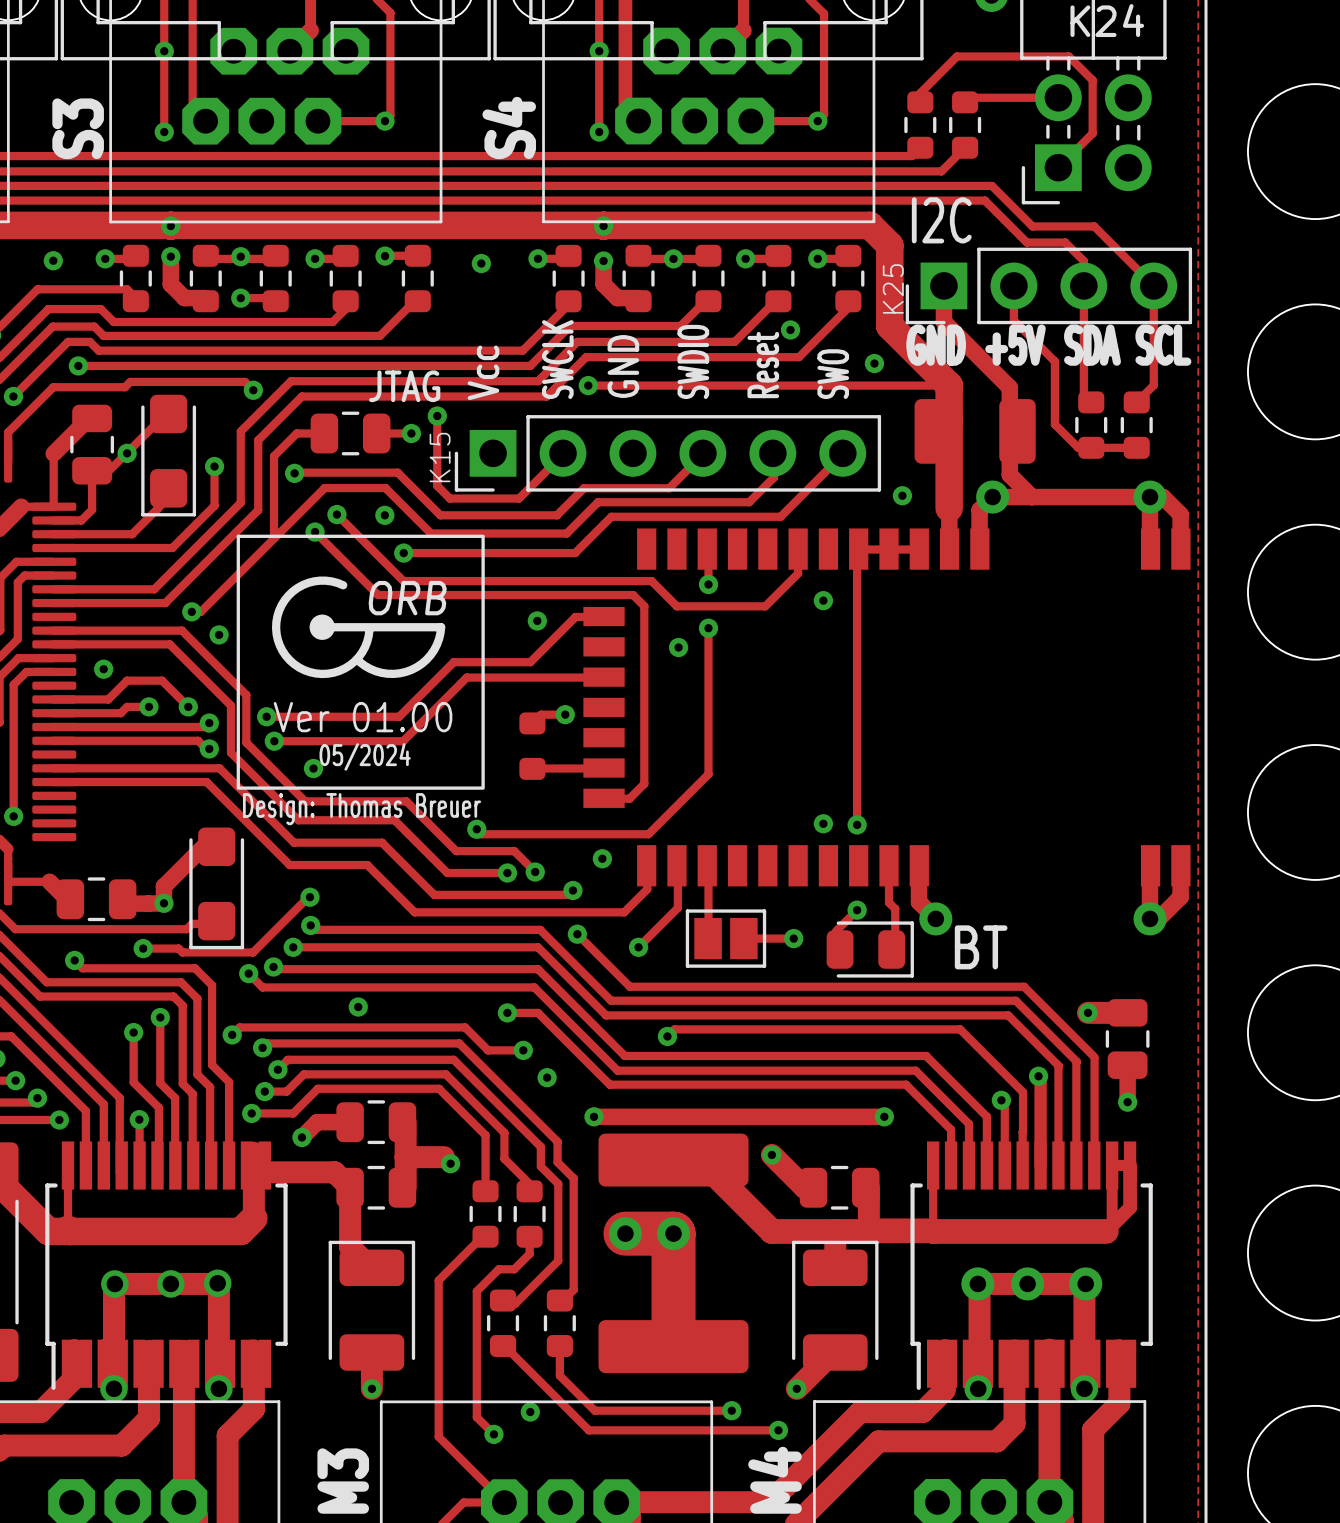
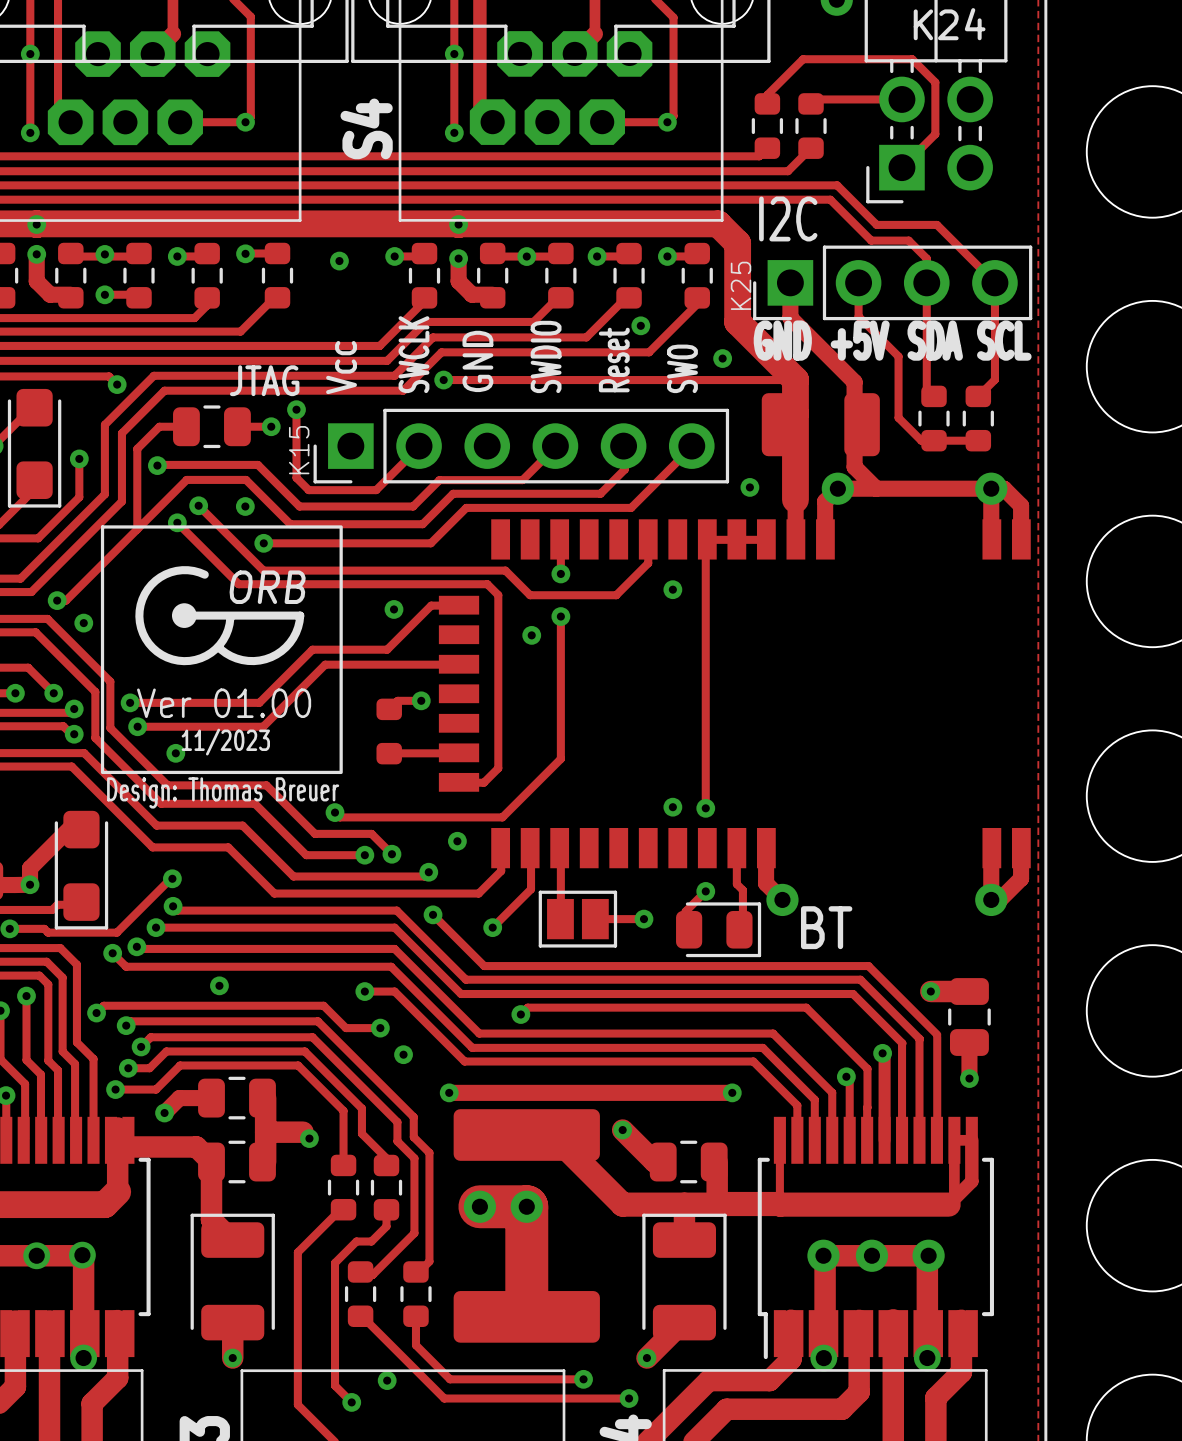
drawing shape: [236, 534, 485, 790] -> [100, 525, 343, 775]

